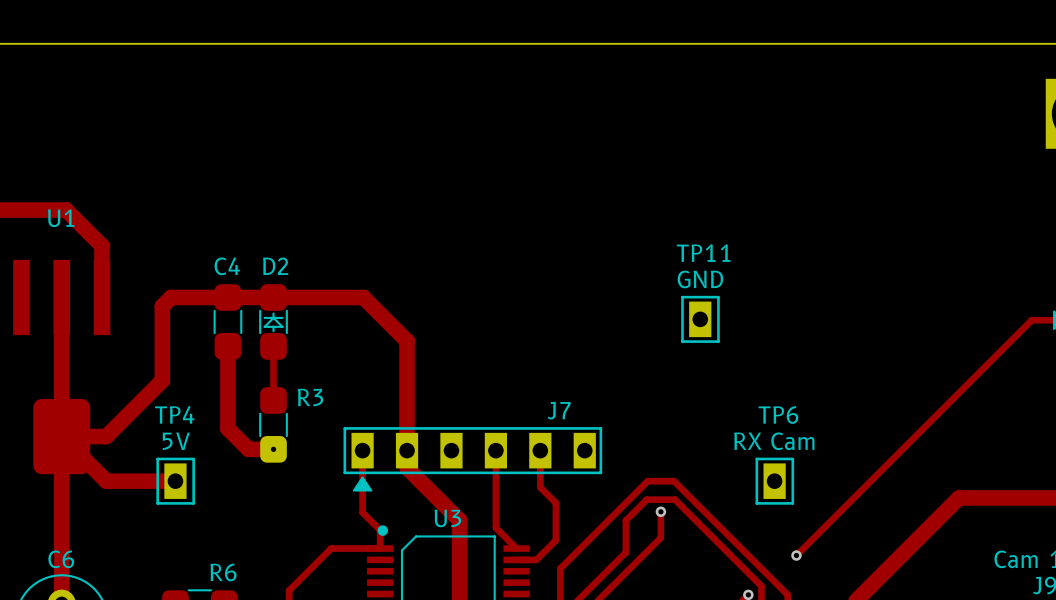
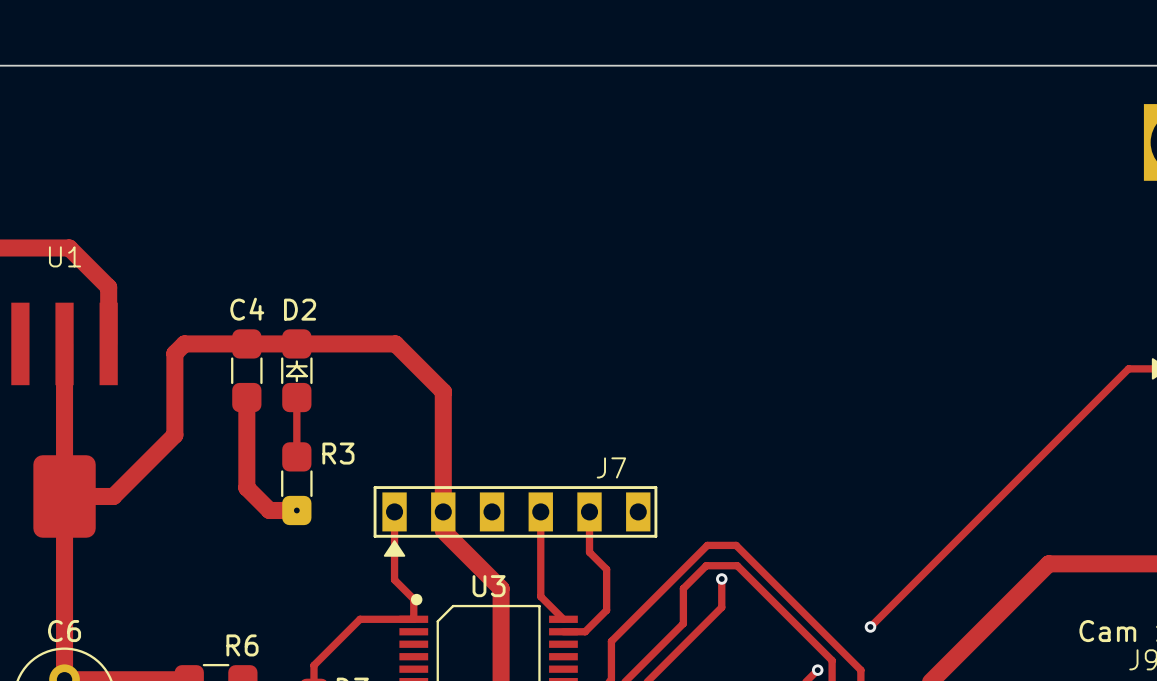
TP11: GND (700, 319) -> none
track: (61, 436) (106, 481) (175, 481) -> none
TP4: 5V (175, 481) -> none
TP6: RX Cam (774, 481) -> none

